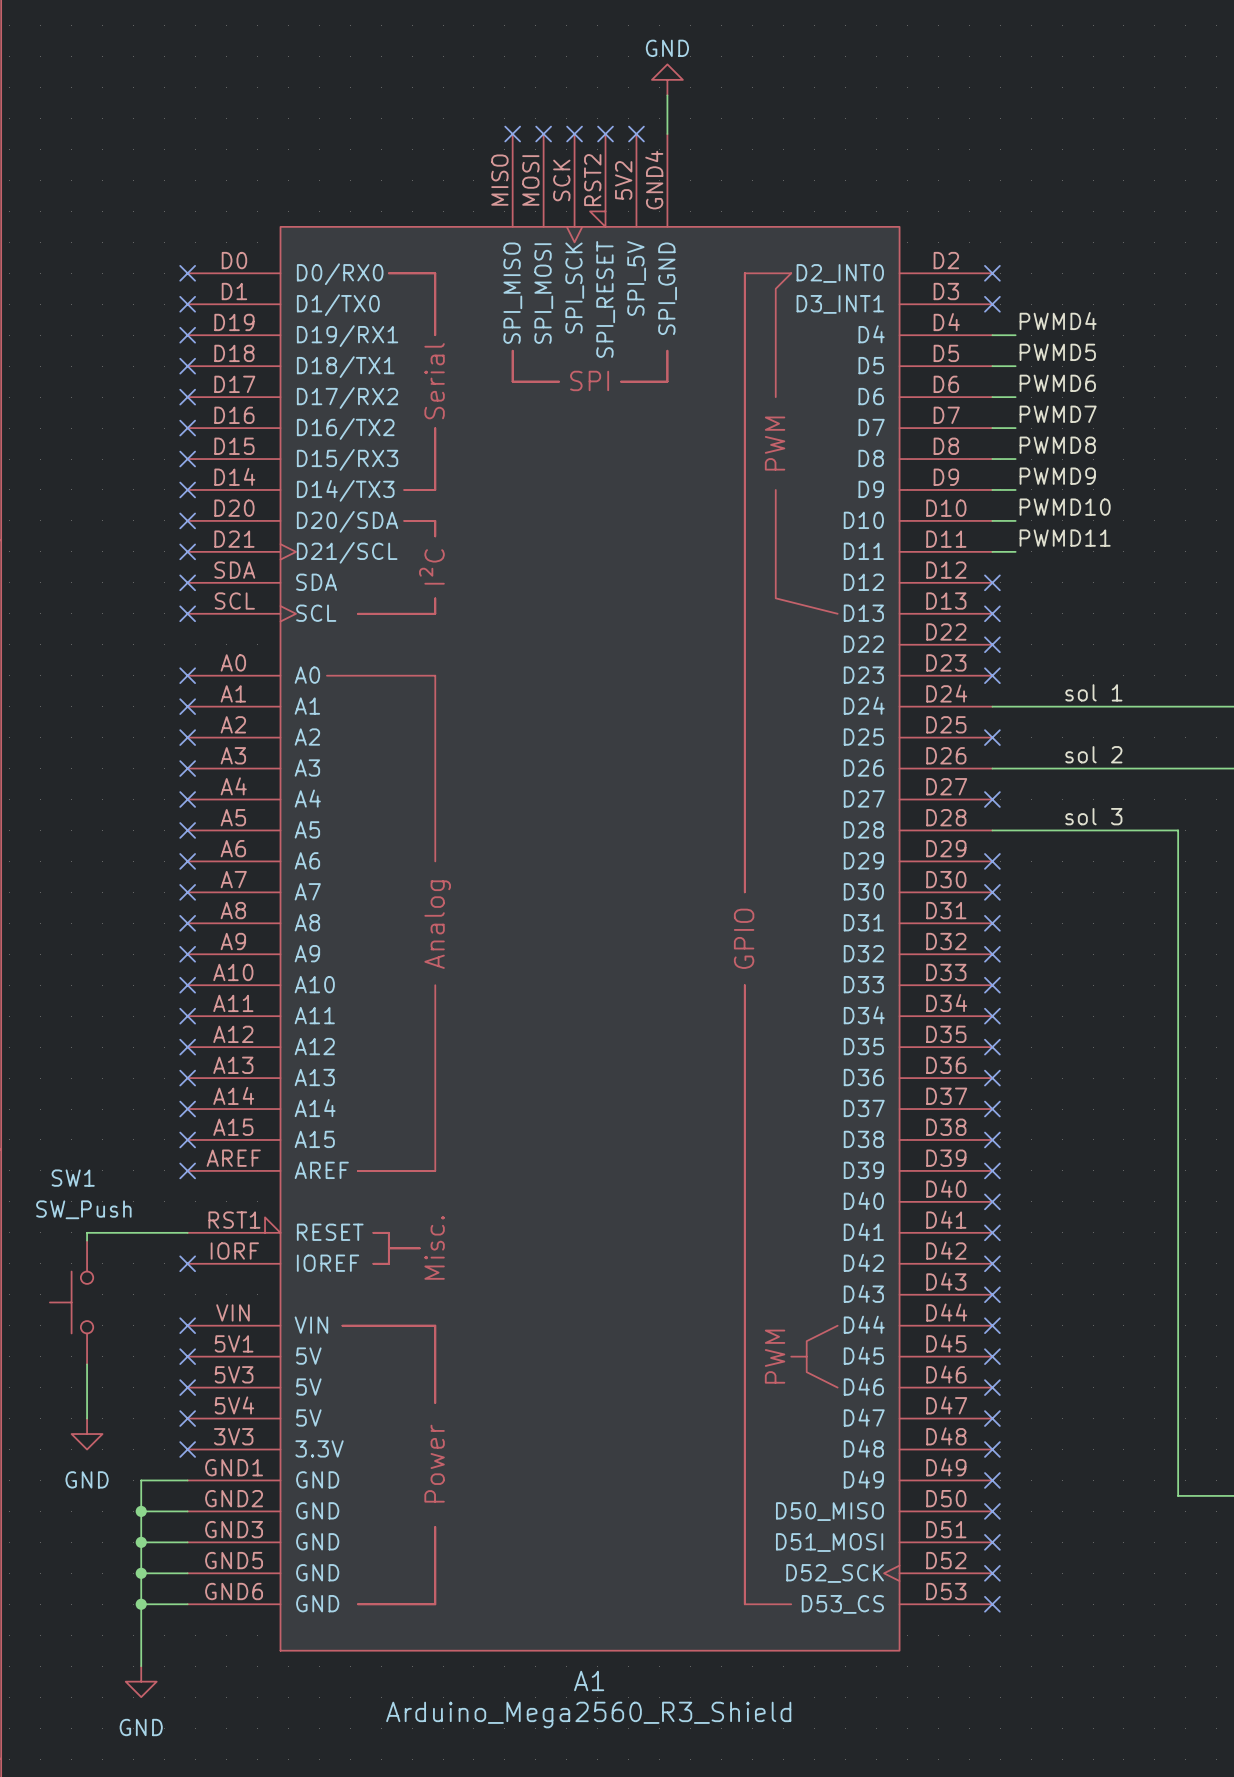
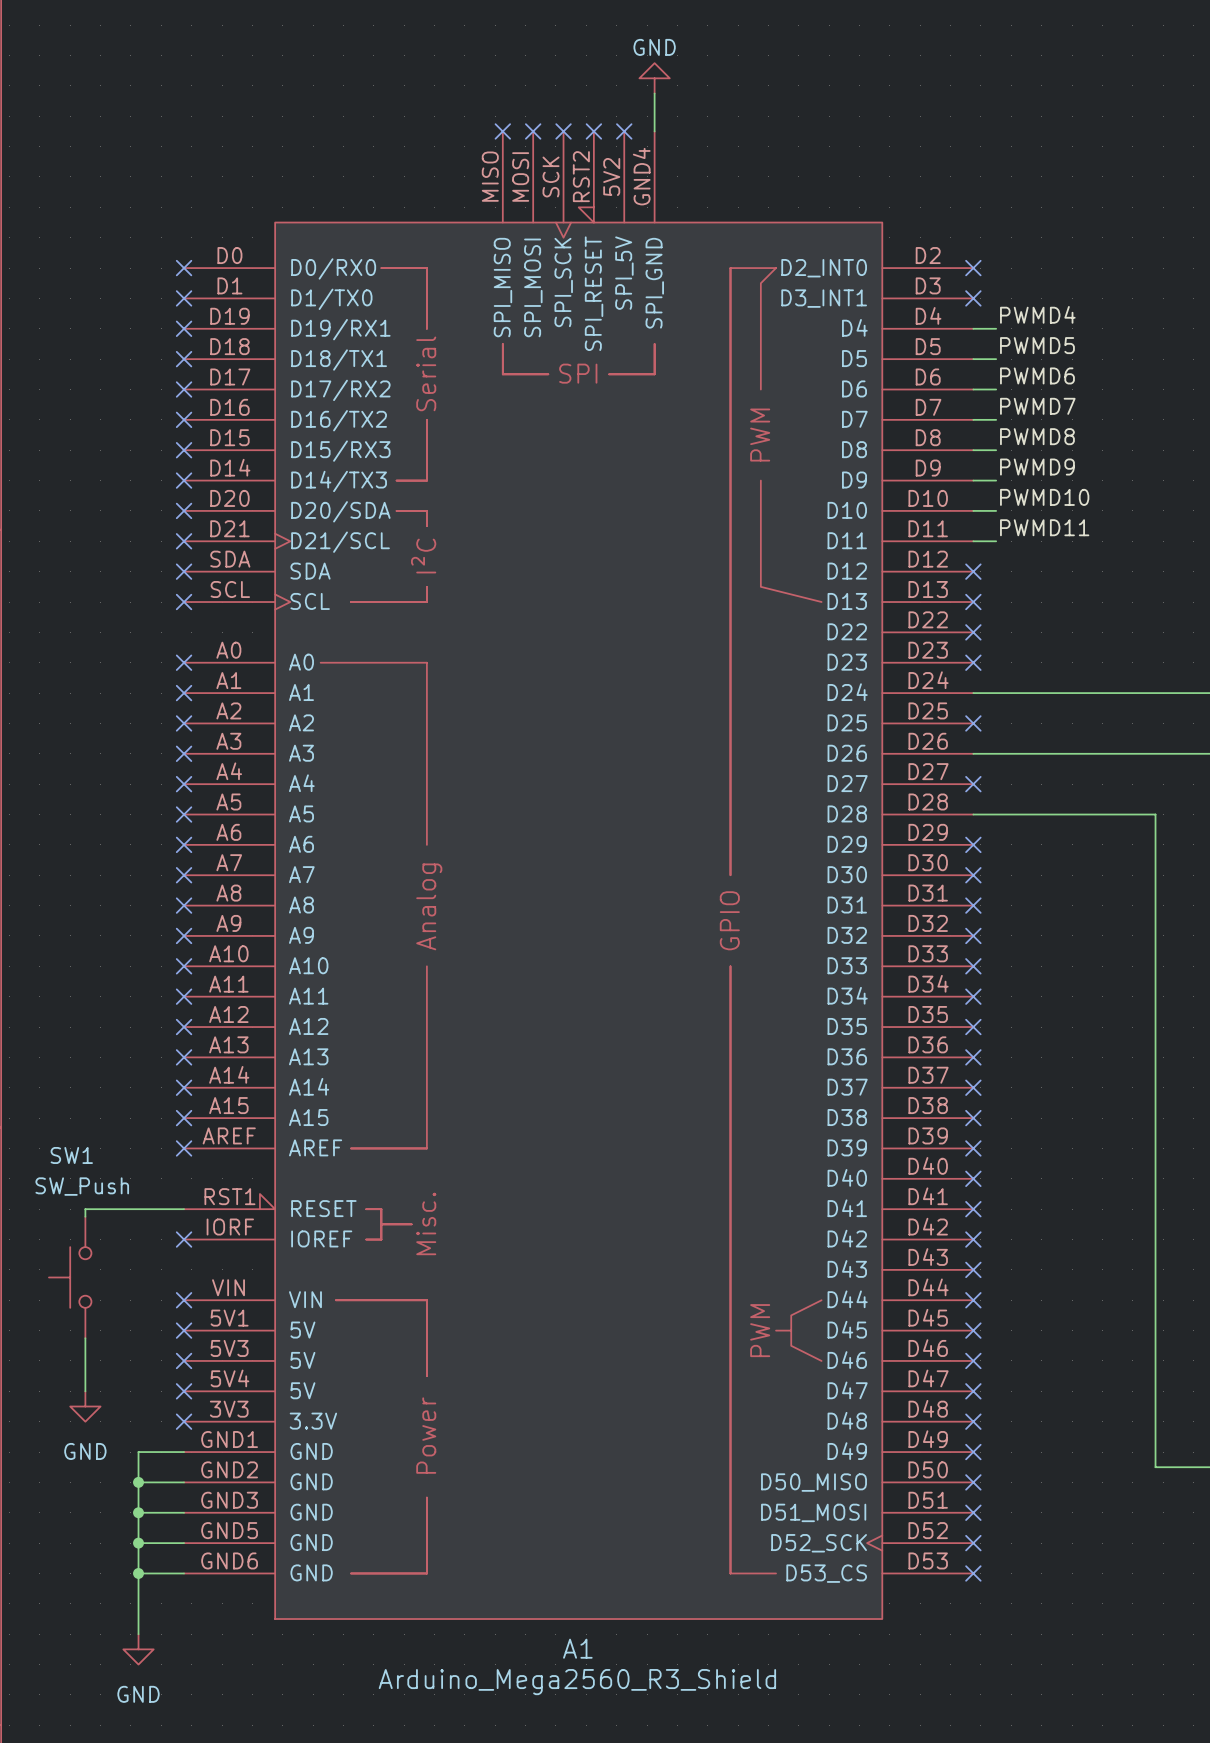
label: sol 1 (1093, 692) -> none
label: sol 2 (1093, 754) -> none
label: sol 3 (1093, 816) -> none

